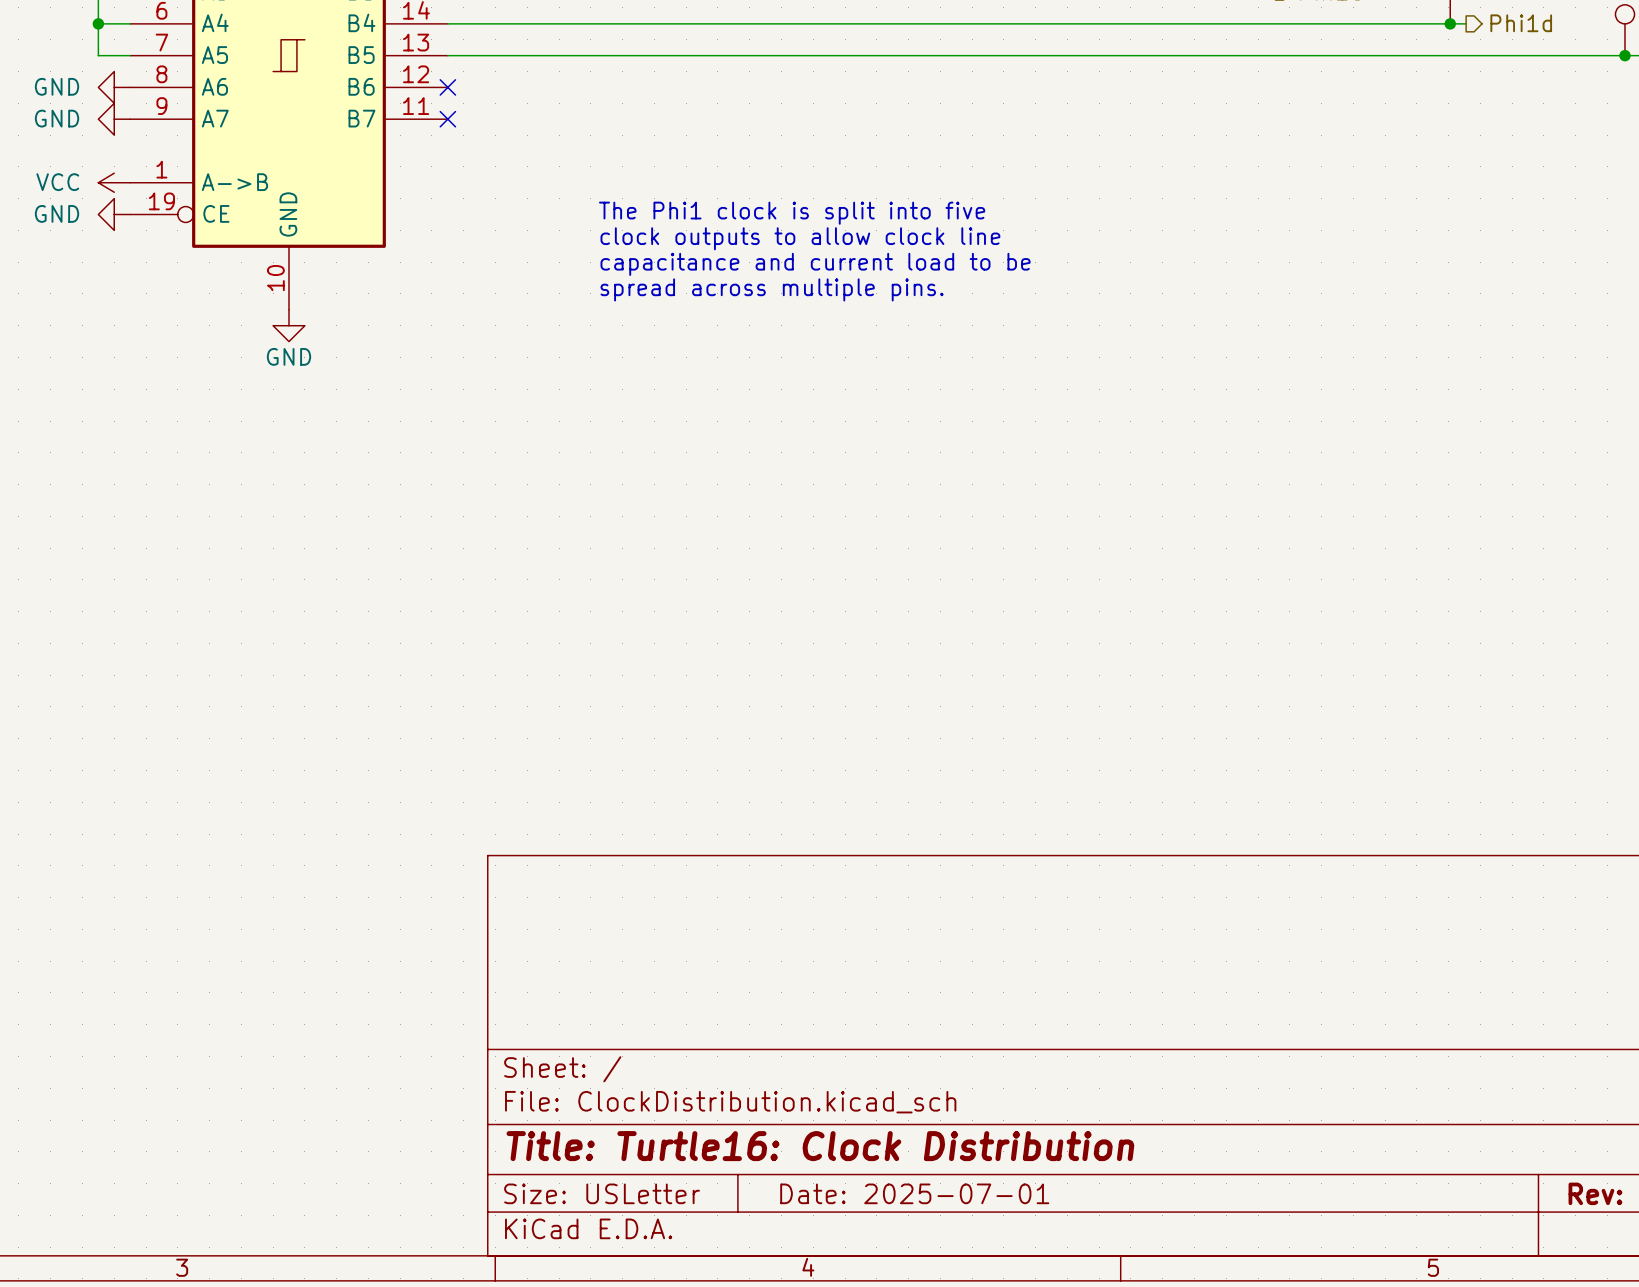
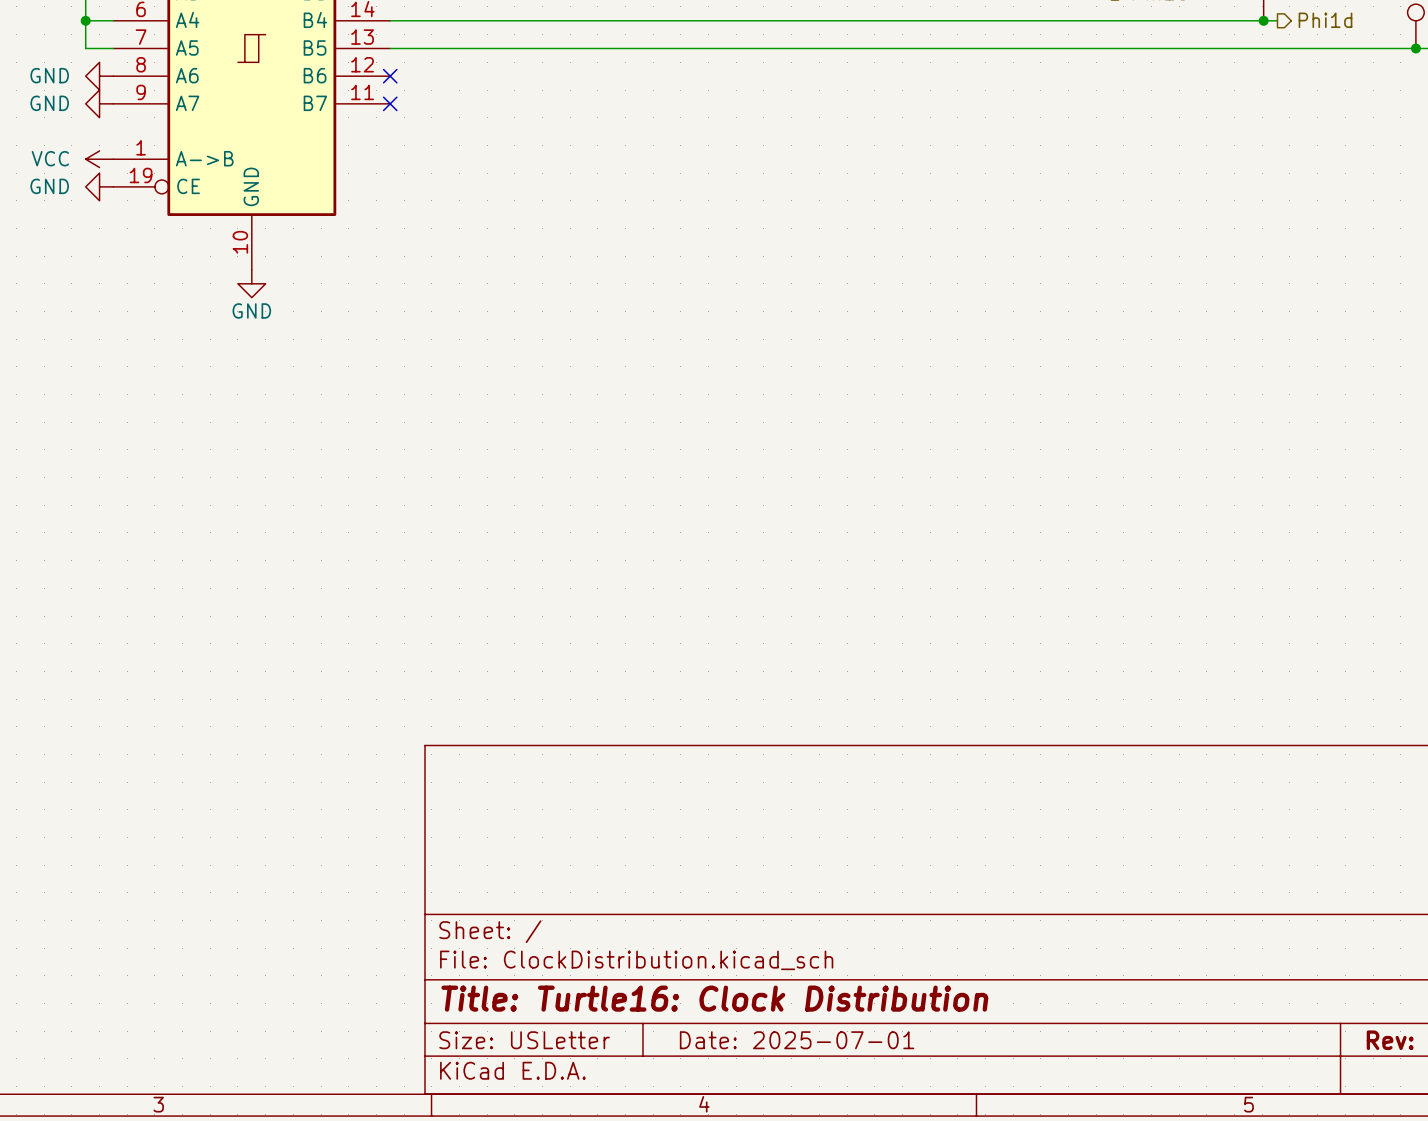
text: The Phi1 clock is split into five (792, 213) -> none
text: clock outputs to allow clock line (800, 238) -> none
text: capacitance and current load to be (815, 264) -> none
text: spread across multiple pins. (772, 289) -> none

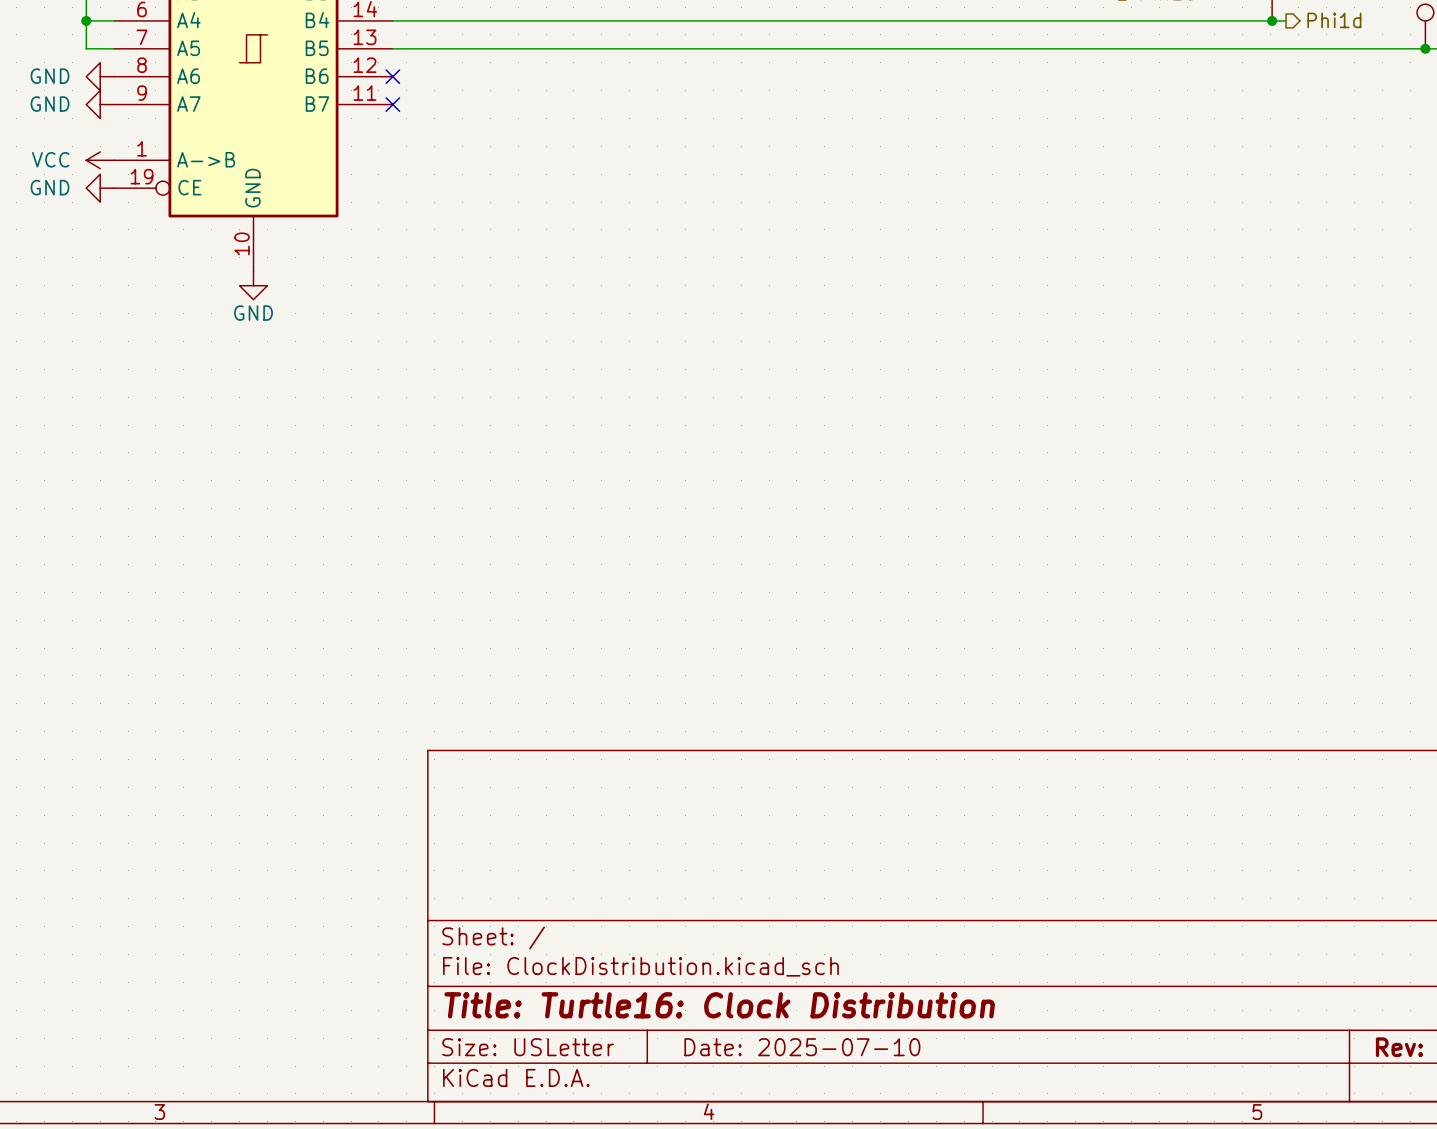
title block: Date: 2025-07-01 (797, 1040) -> Date: 2025-07-10 (802, 1047)

